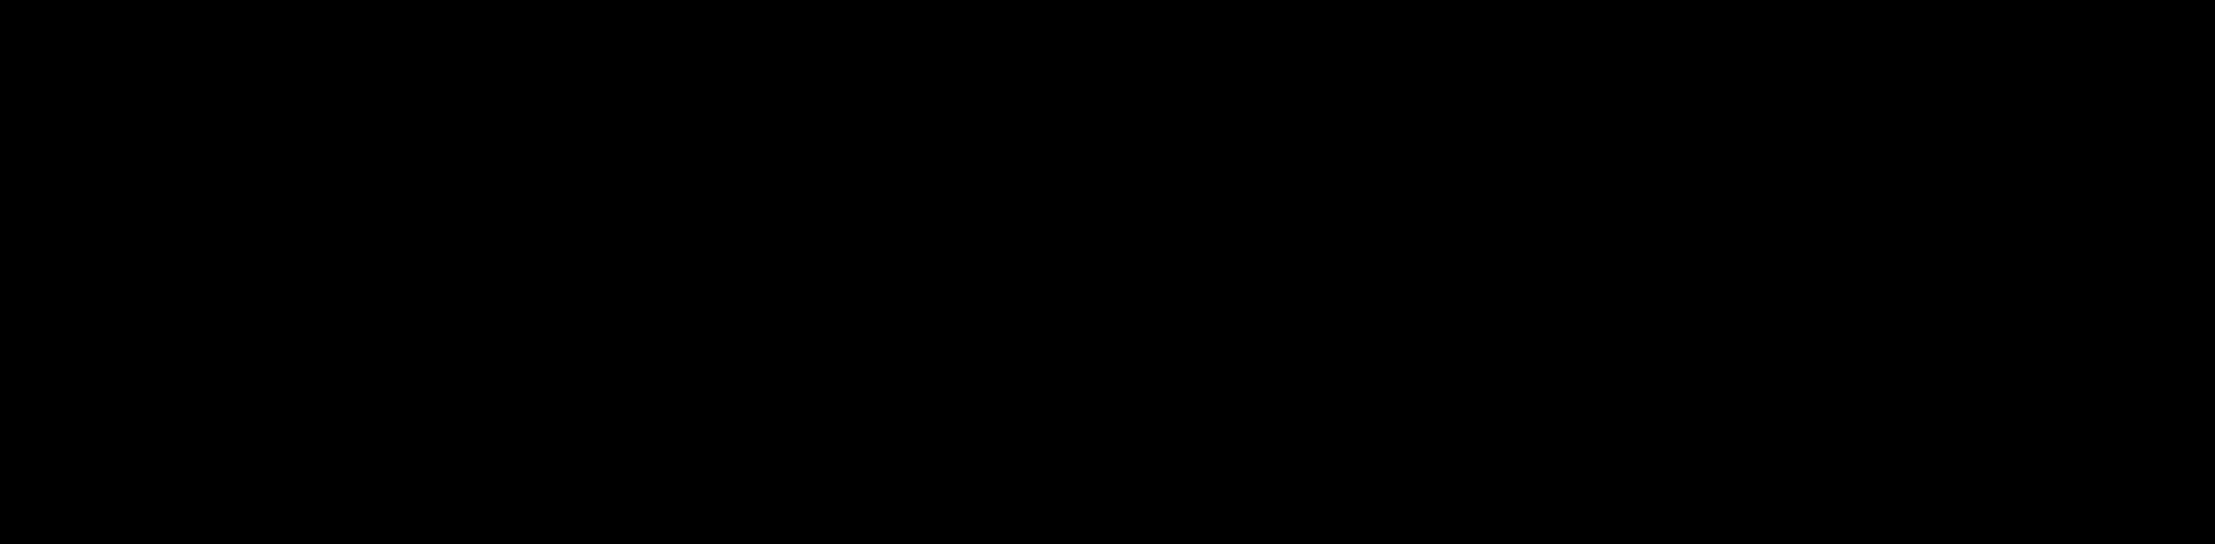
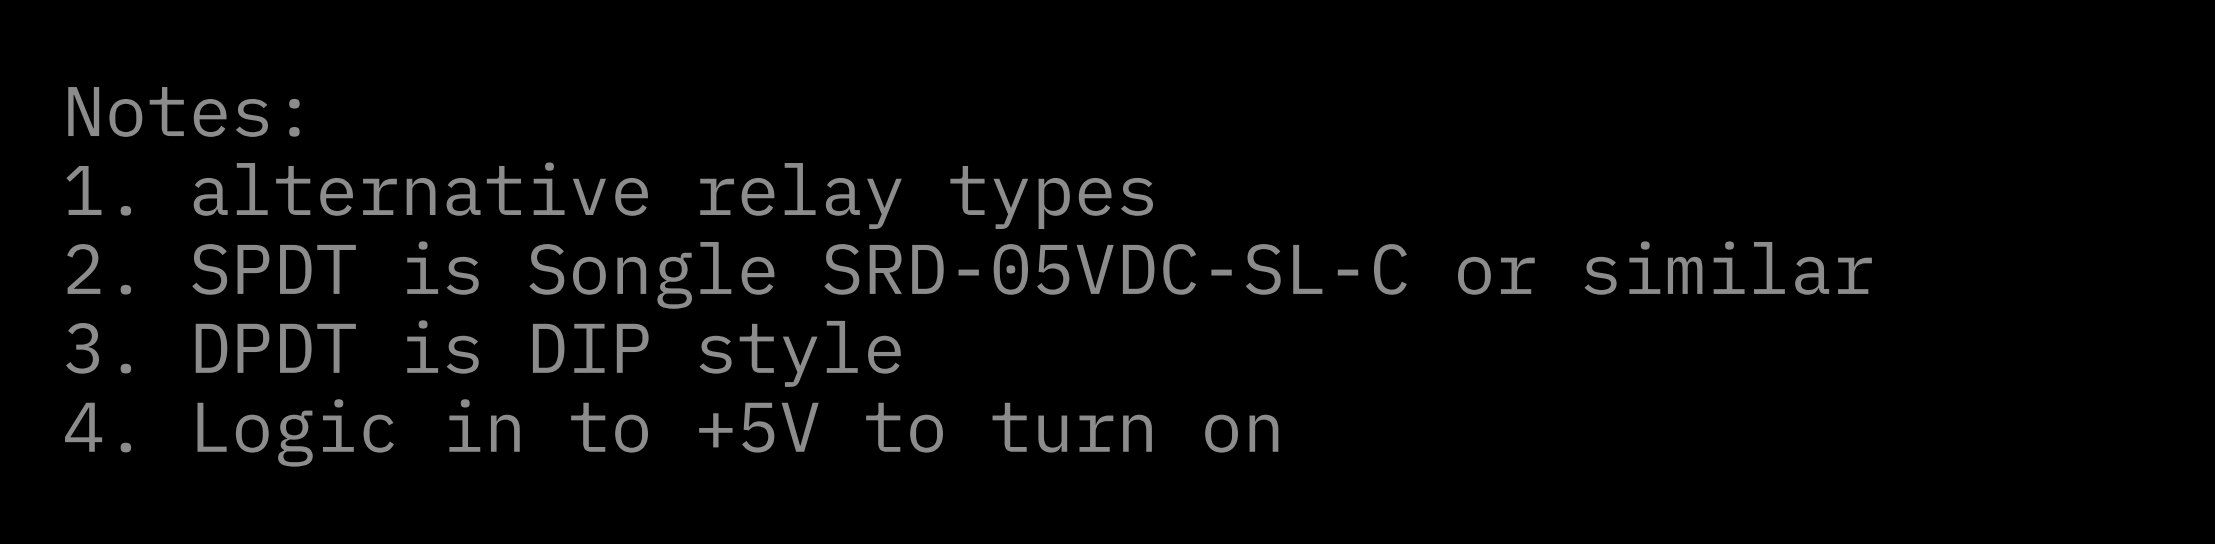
text: none -> Notes: (183, 111)
text: none -> 1. alternative relay types (609, 195)
text: none -> 2. SPDT is Songle SRD-05VDC-SL-C or similar (969, 275)
text: none -> 3. DPDT is DIP style (483, 353)
text: none -> 4. Logic in to +5V to turn on (671, 432)

